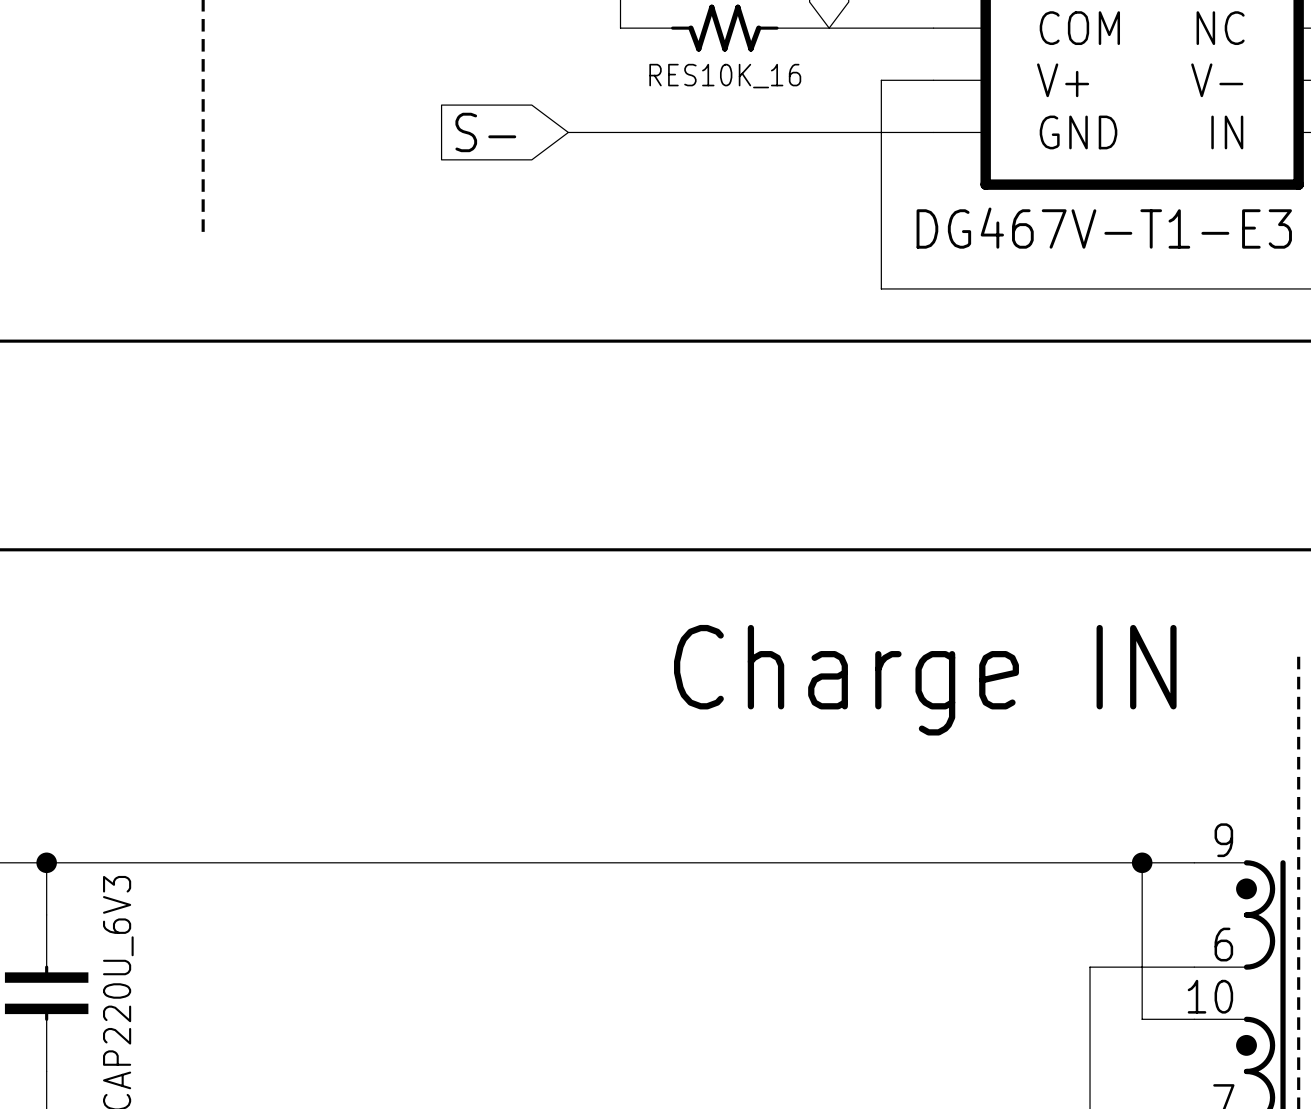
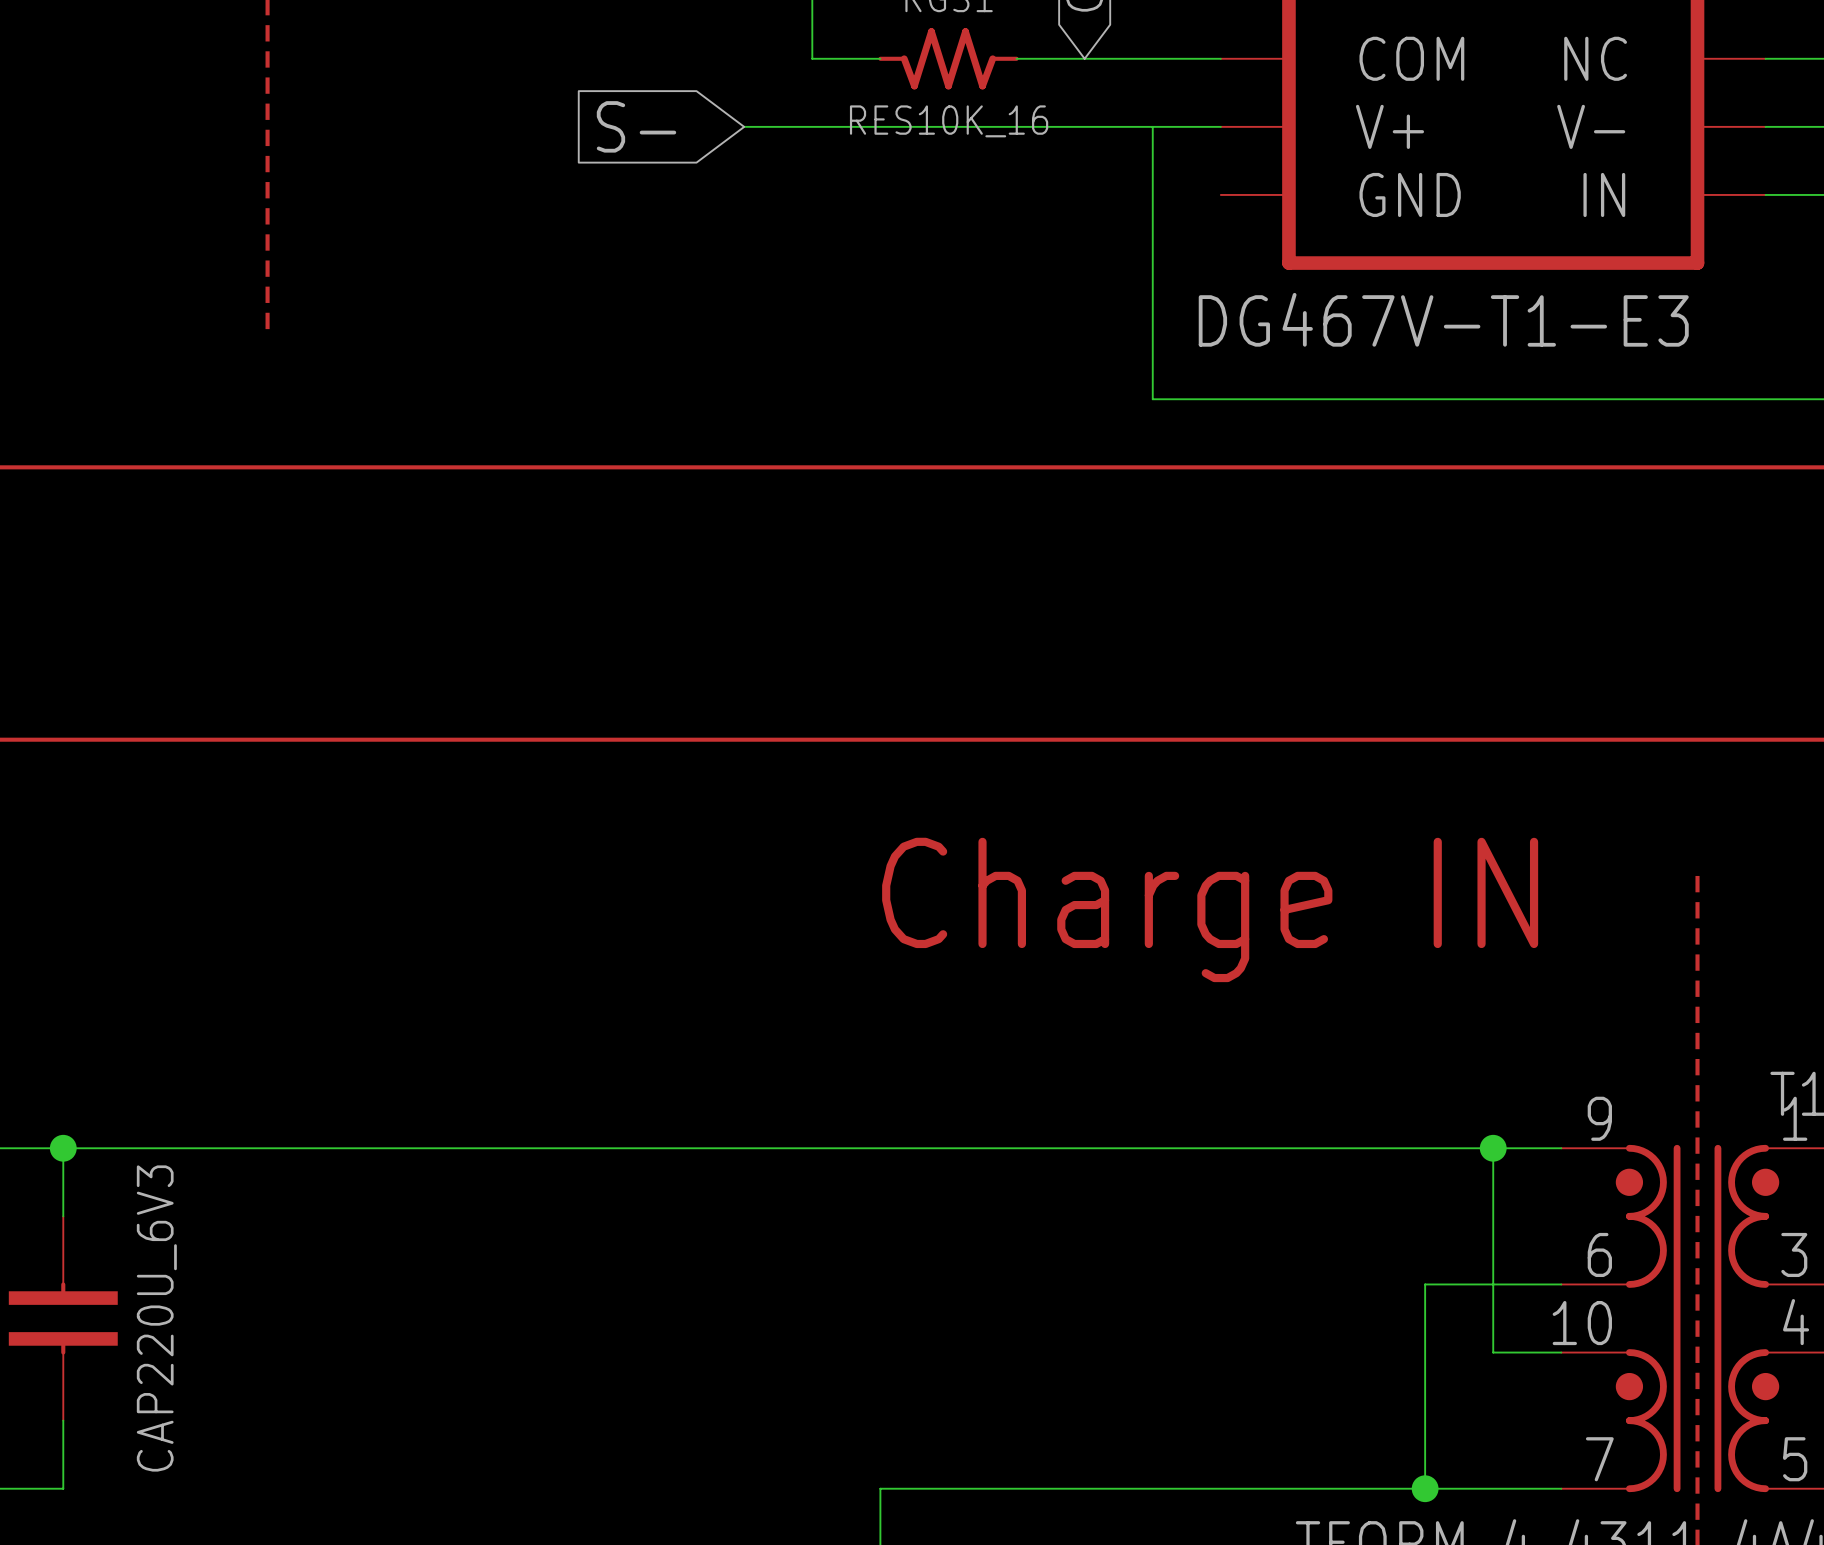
wire: none -> (744, 126) (1152, 126)
global label position: S- (485, 132) -> S- (636, 126)
wire: (568, 132) (933, 132) -> none

